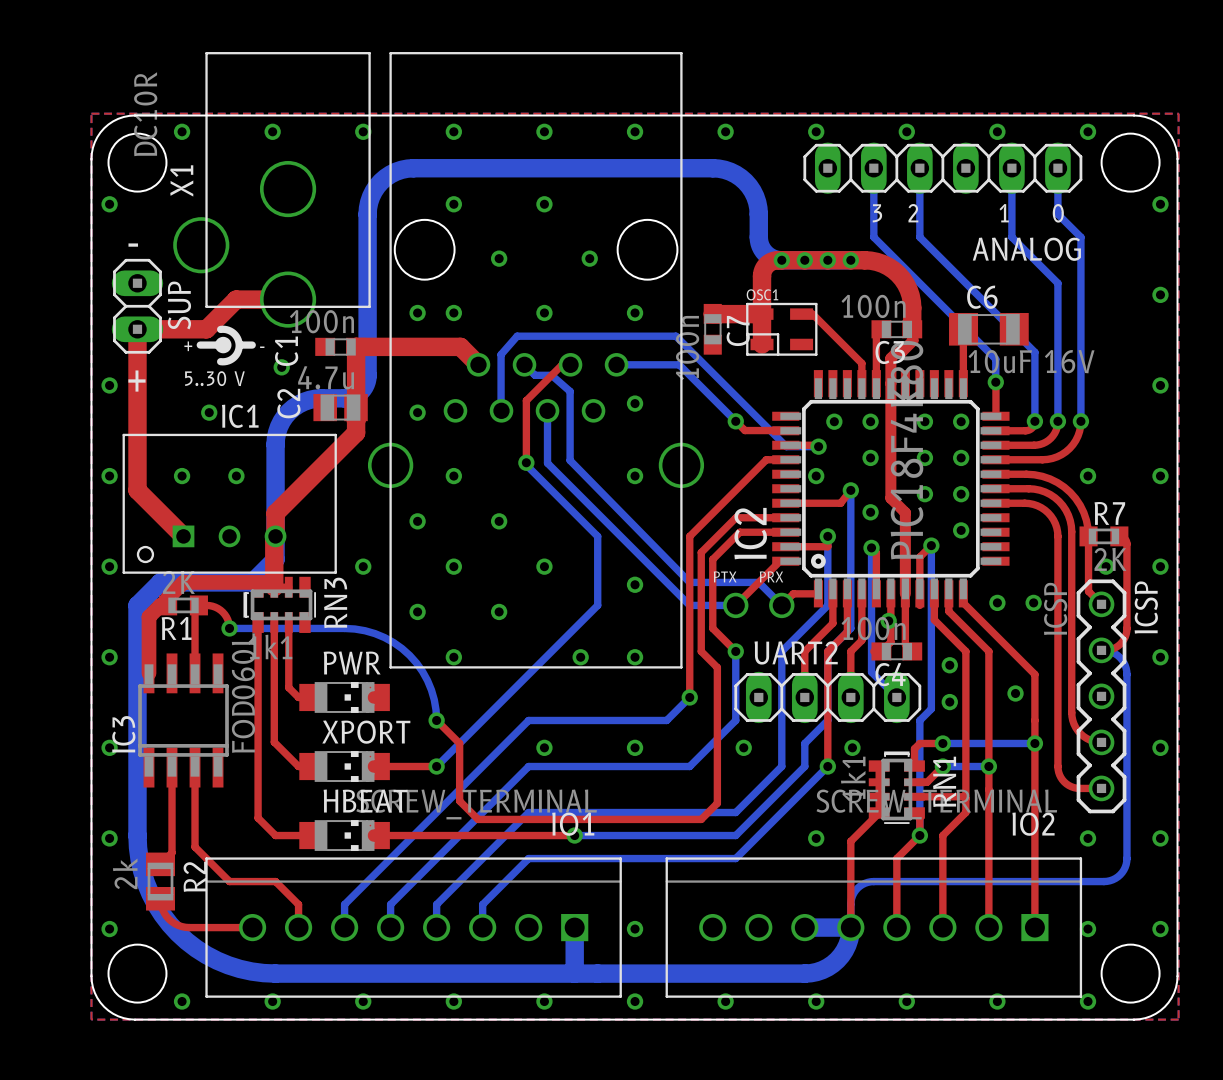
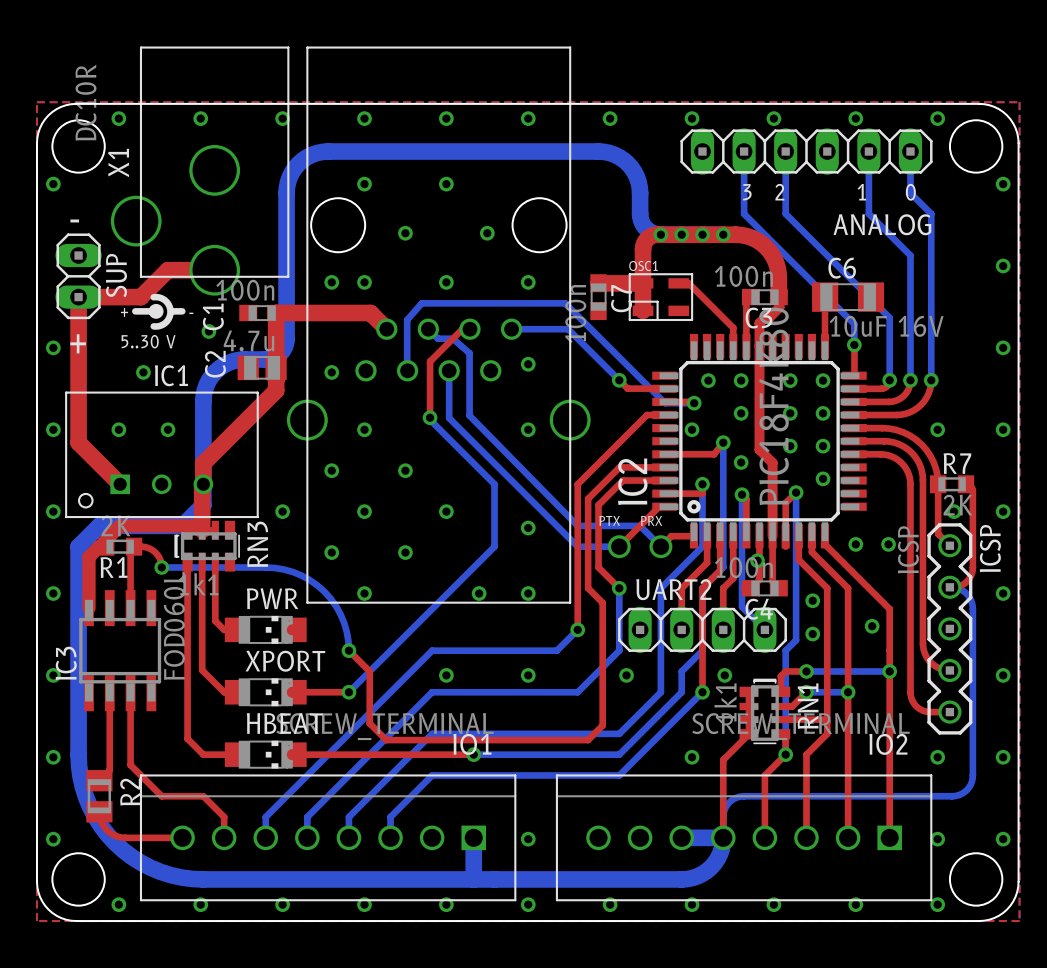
R2 value: 2k (125, 873) -> none

